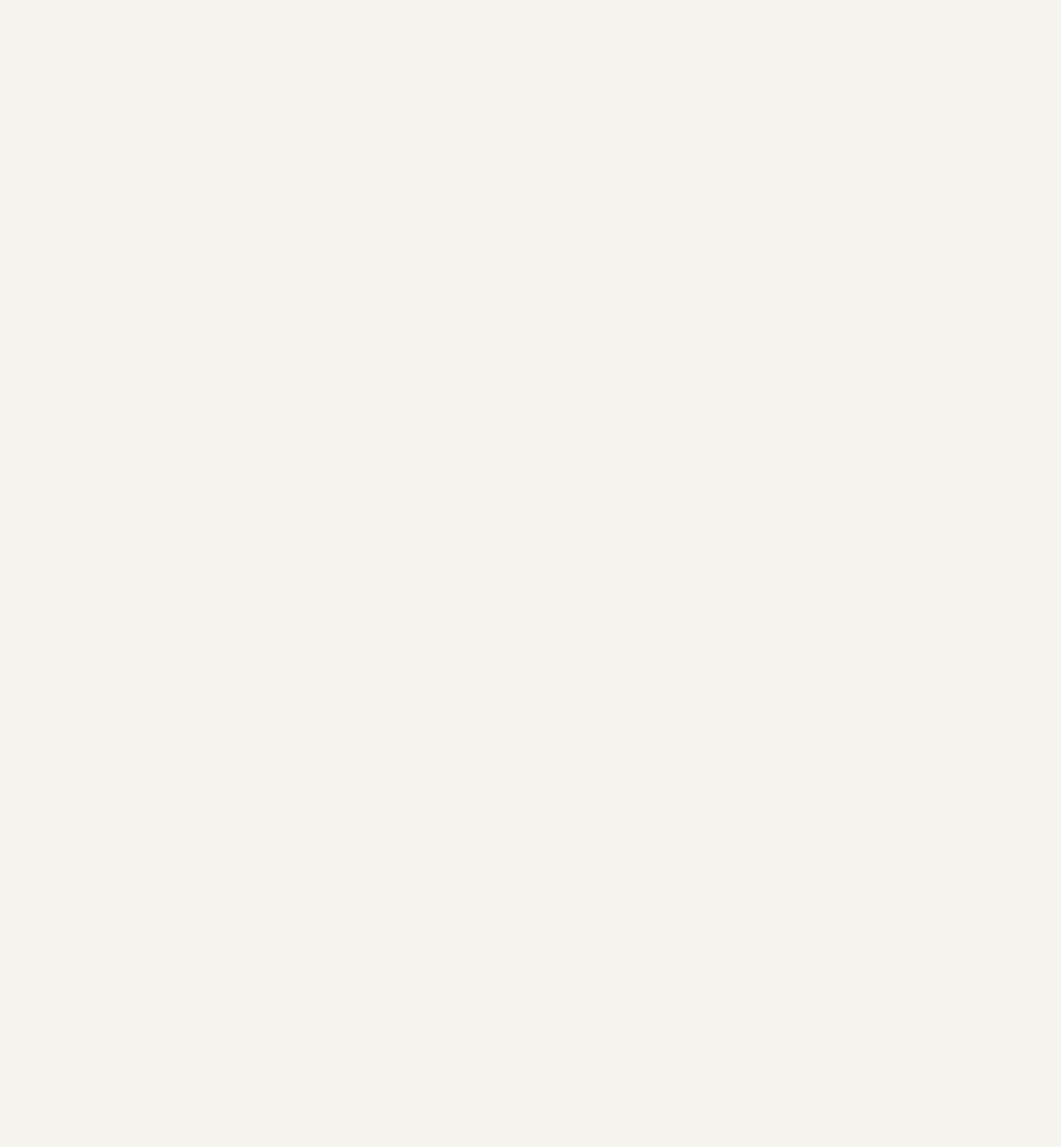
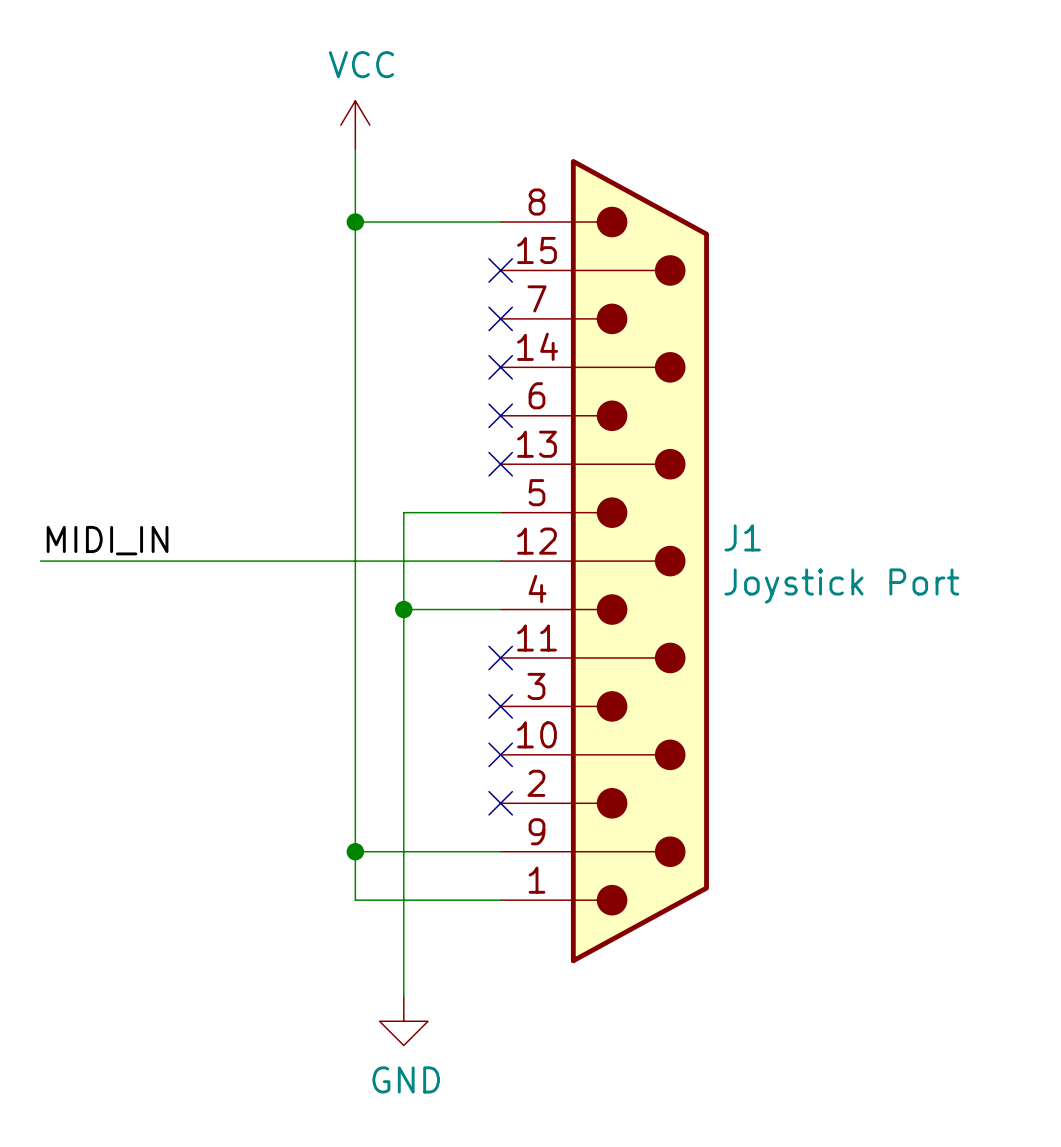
power symbol: none -> VCC (355, 125)
wire: none -> (355, 149) (355, 900) (500, 900)
wire: none -> (355, 222) (500, 222)
junction: none -> (355, 222)
no-connect mark: none -> (500, 270)
no-connect mark: none -> (500, 318)
no-connect mark: none -> (500, 367)
no-connect mark: none -> (500, 415)
no-connect mark: none -> (500, 464)
wire: none -> (500, 512) (403, 512) (403, 997)
label: none -> MIDI_IN (107, 540)
wire: none -> (40, 561) (500, 561)
J1: none -> Joystick Port (604, 561)
wire: none -> (403, 609) (500, 609)
junction: none -> (403, 609)
no-connect mark: none -> (500, 657)
no-connect mark: none -> (500, 706)
no-connect mark: none -> (500, 754)
no-connect mark: none -> (500, 803)
wire: none -> (355, 851) (500, 851)
junction: none -> (355, 851)
power symbol: none -> GND (403, 1021)

